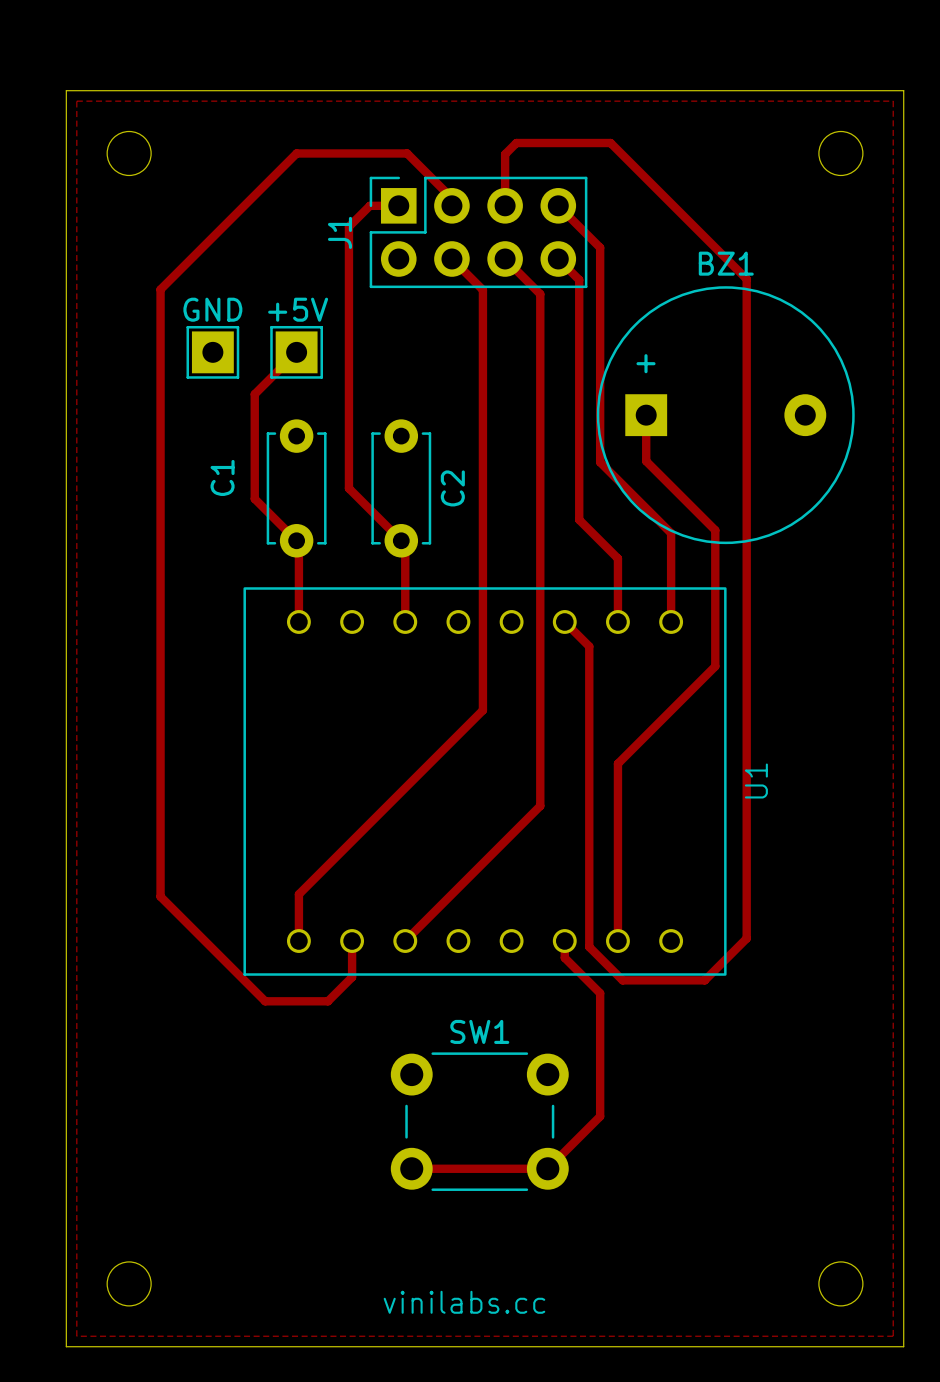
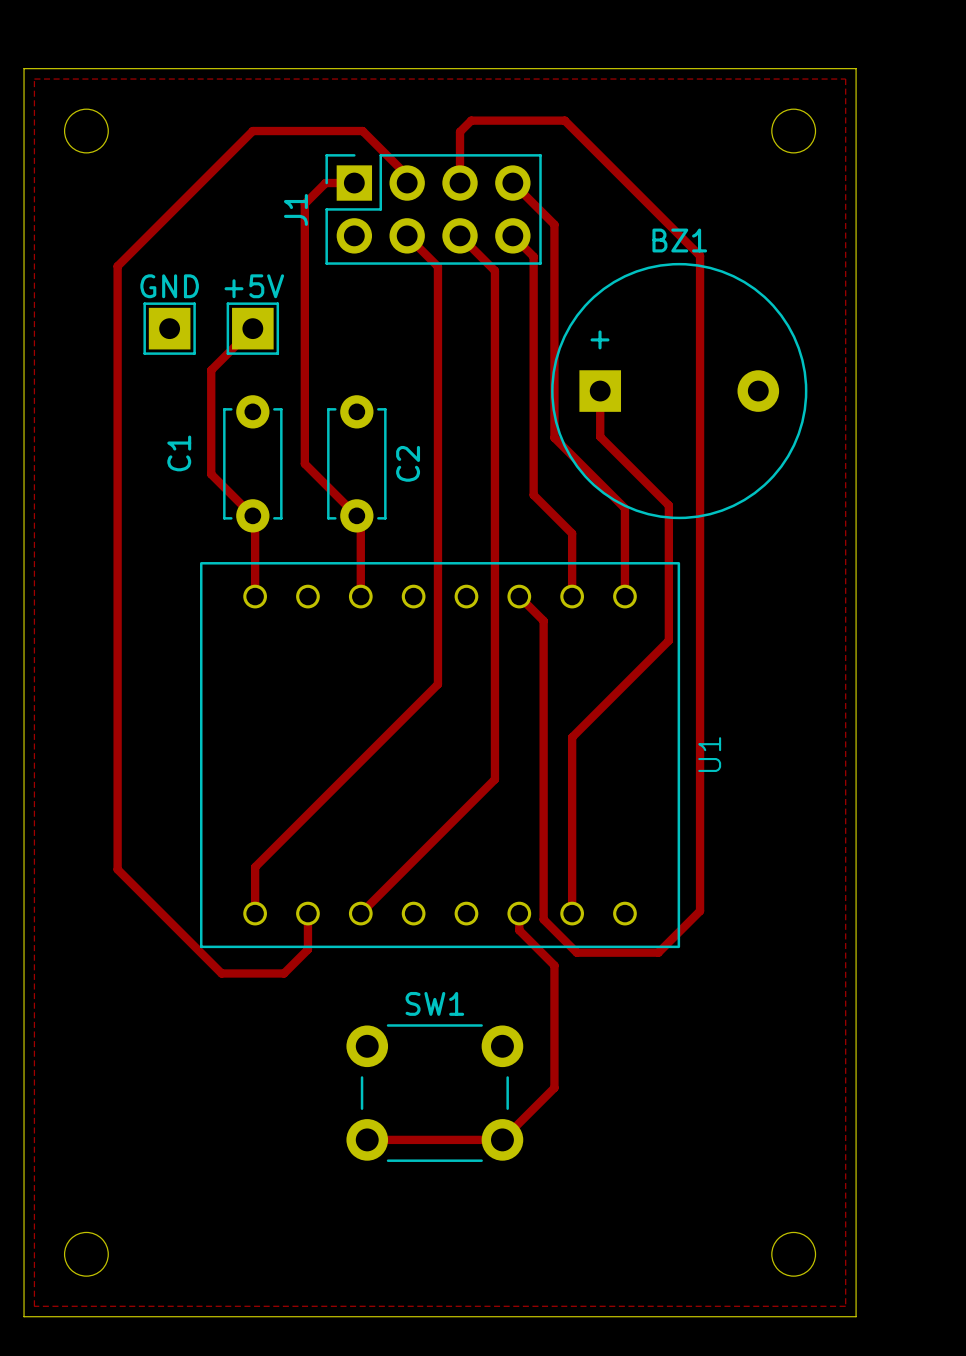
text: vinilabs.cc (464, 1302) -> none

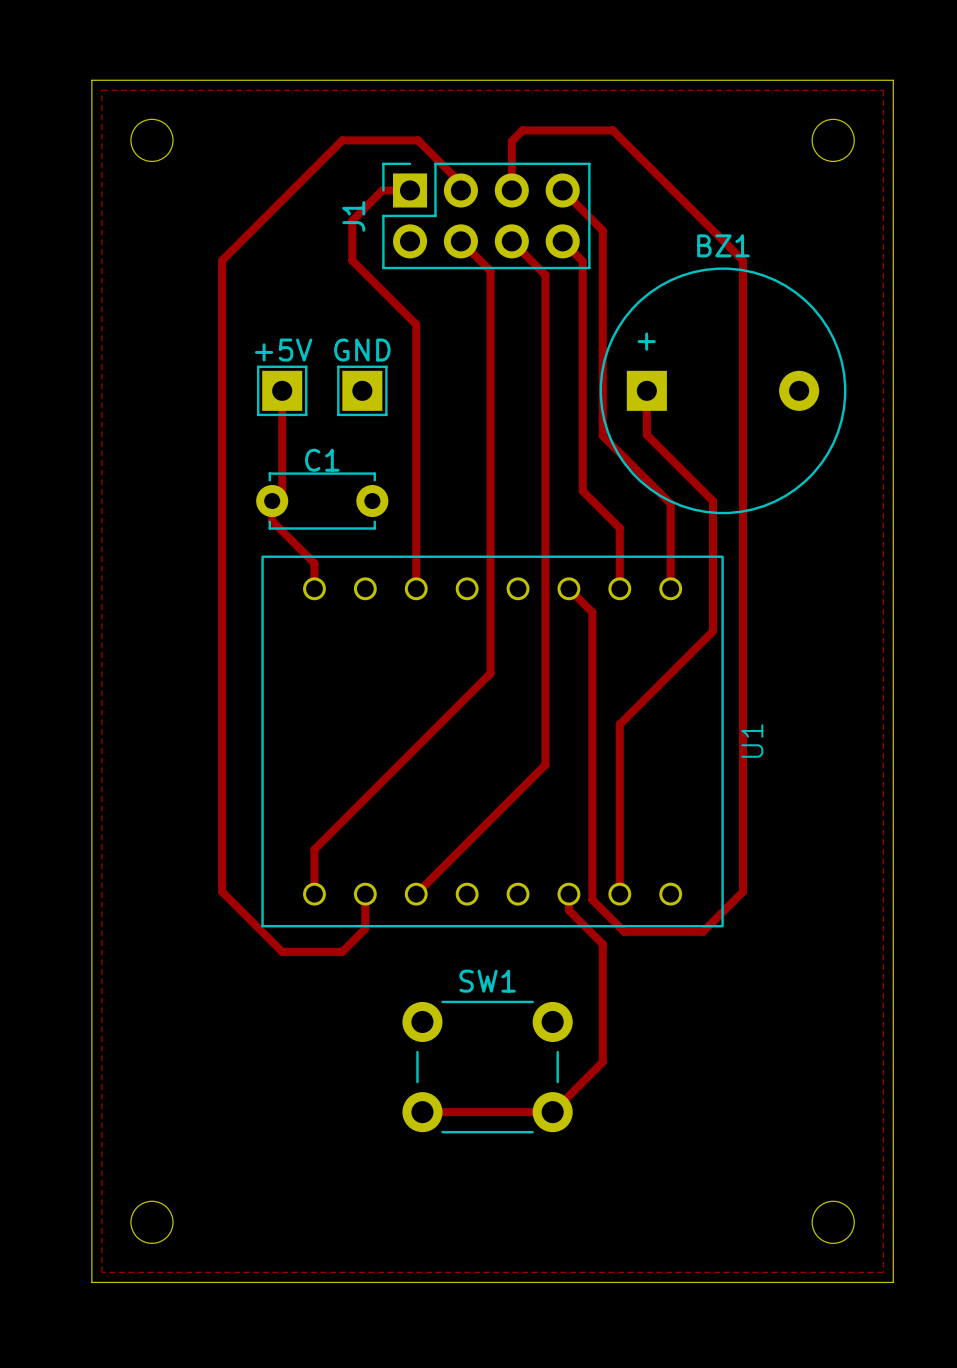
top track: (284, 131) (252, 131) (117, 266) (117, 869) (159, 911) -> (342, 140) (222, 260) (222, 891)
top track: (304, 203) (304, 463) (360, 519) -> (362, 210) (352, 220) (352, 260) (416, 324) (416, 514)
part position: (169, 328) -> (362, 390)
top track: (252, 328) (211, 370) (211, 474) (255, 518) (255, 570) -> (282, 390) (282, 491) (272, 501) (272, 521) (314, 563)
part position: (252, 328) -> (282, 390)
C1 rotation: 0° (252, 463) -> 90° clockwise (322, 501)
C2: (356, 463) -> none

